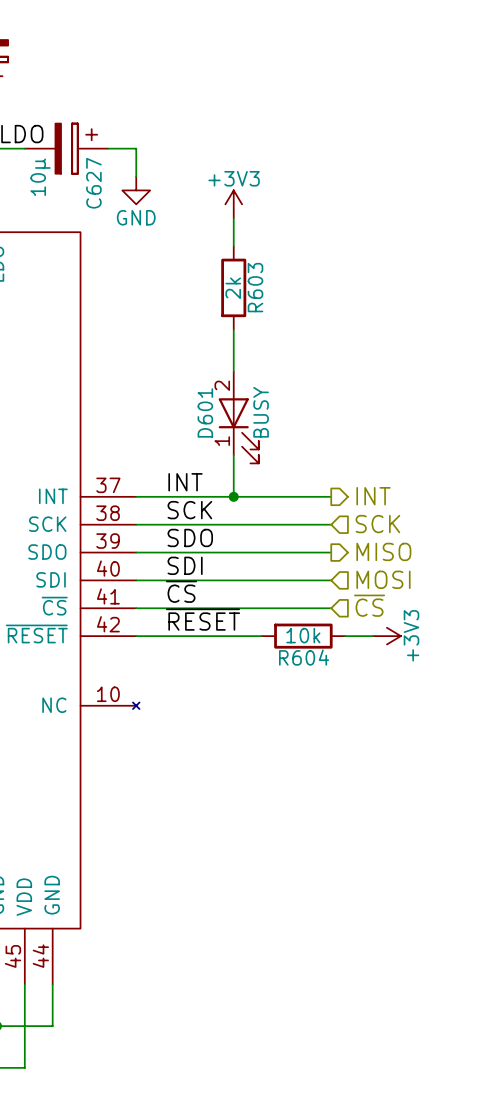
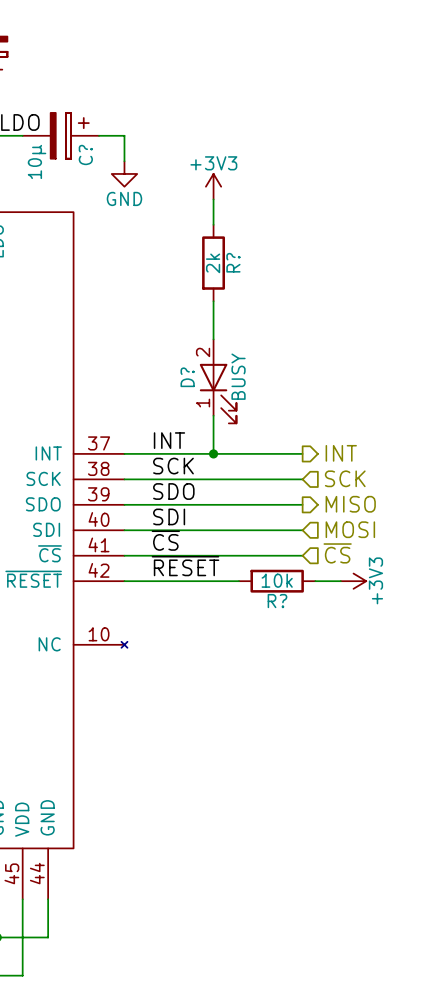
C627 name: C627 (93, 183) -> C? (85, 154)
R603 name: R603 (255, 287) -> R? (233, 262)
D601 name: D601 (205, 412) -> D? (187, 377)
R604 name: R604 (304, 657) -> R? (277, 601)

